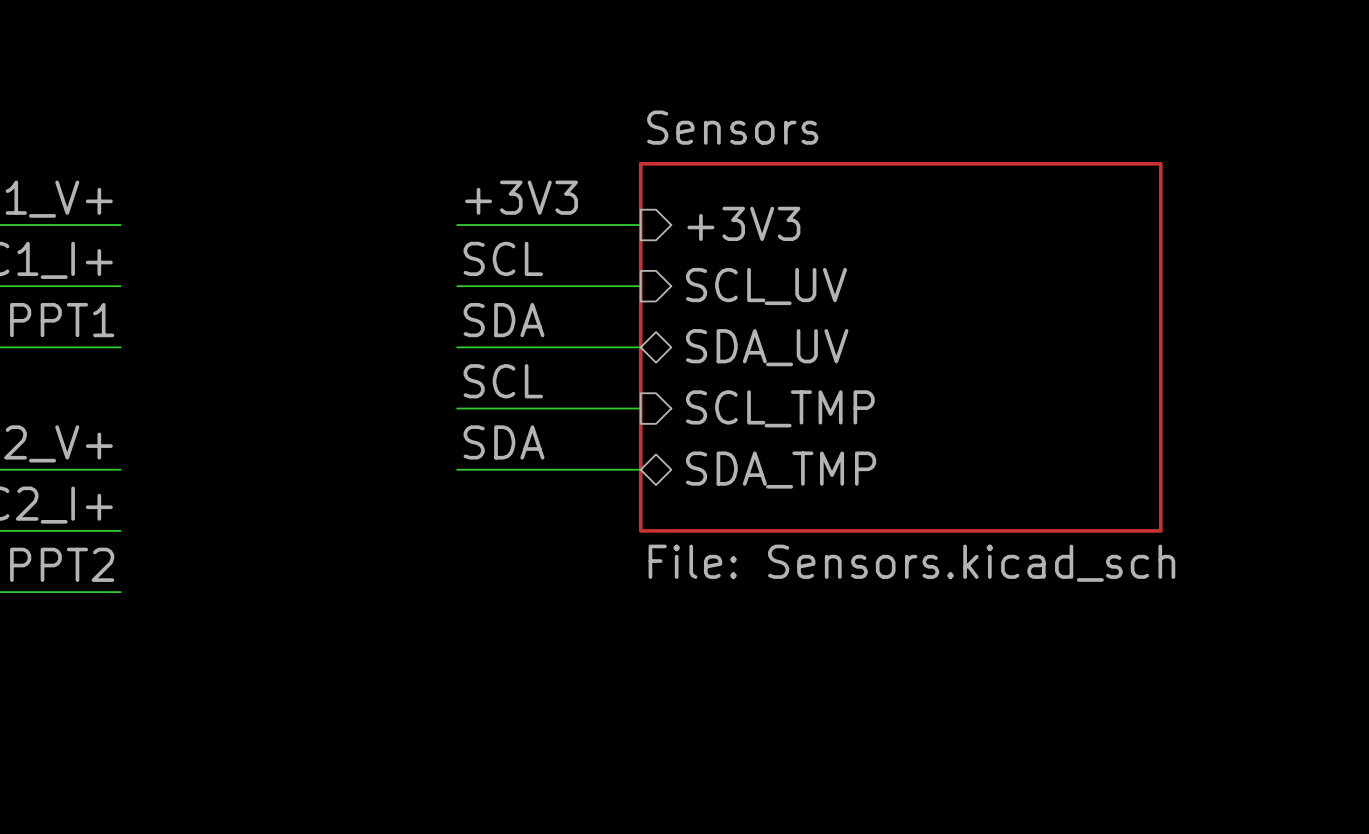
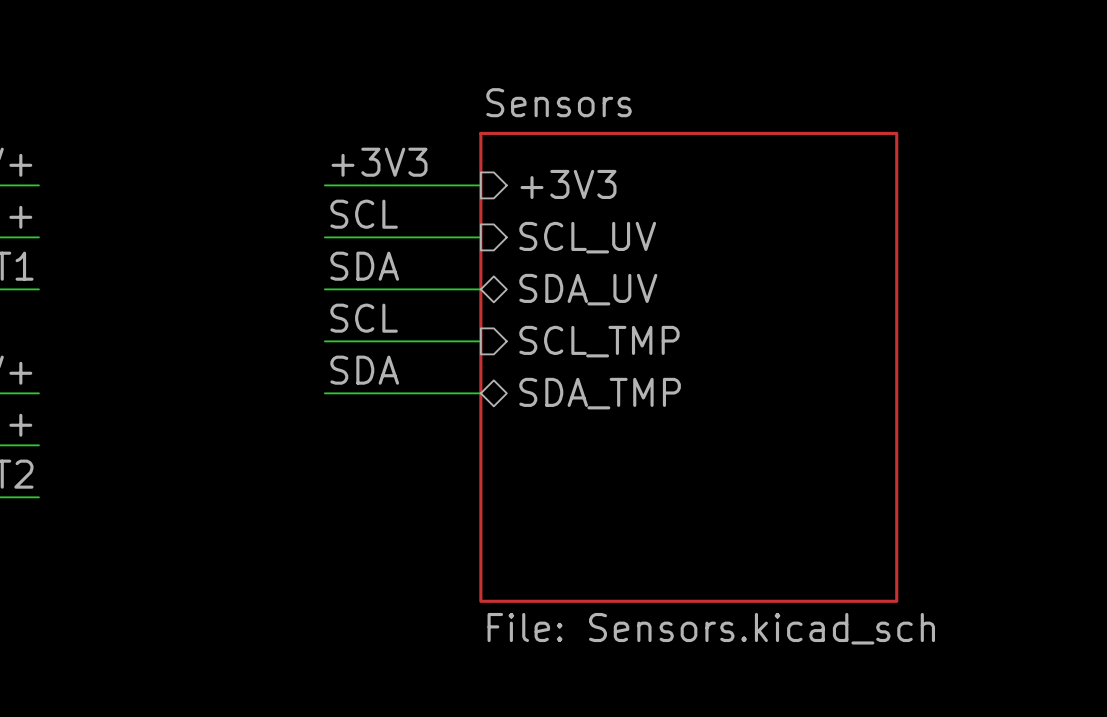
sheet Sensors: File: Sensors.kicad_sch (900, 347) -> none
sheet Sensors: none -> File: Sensors.kicad_sch (688, 367)

